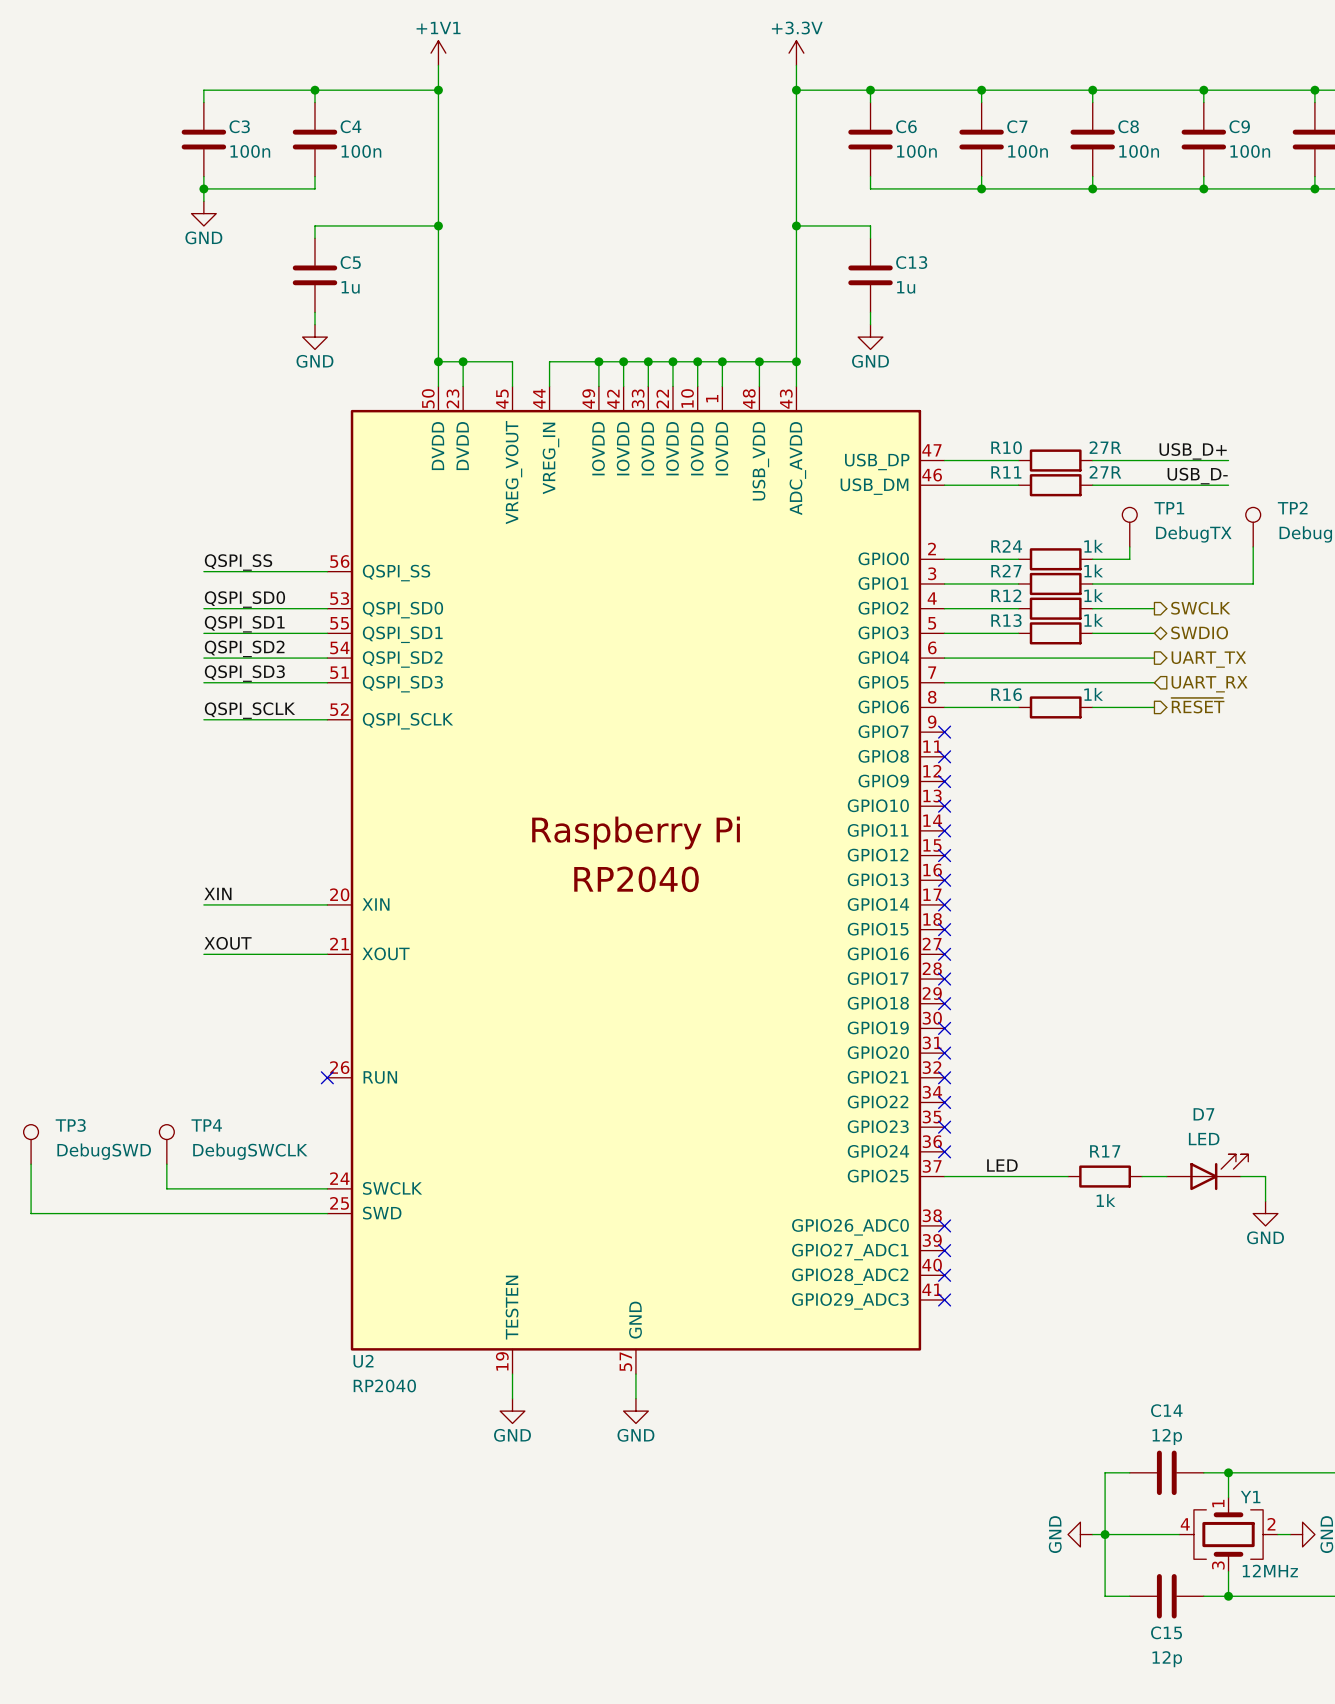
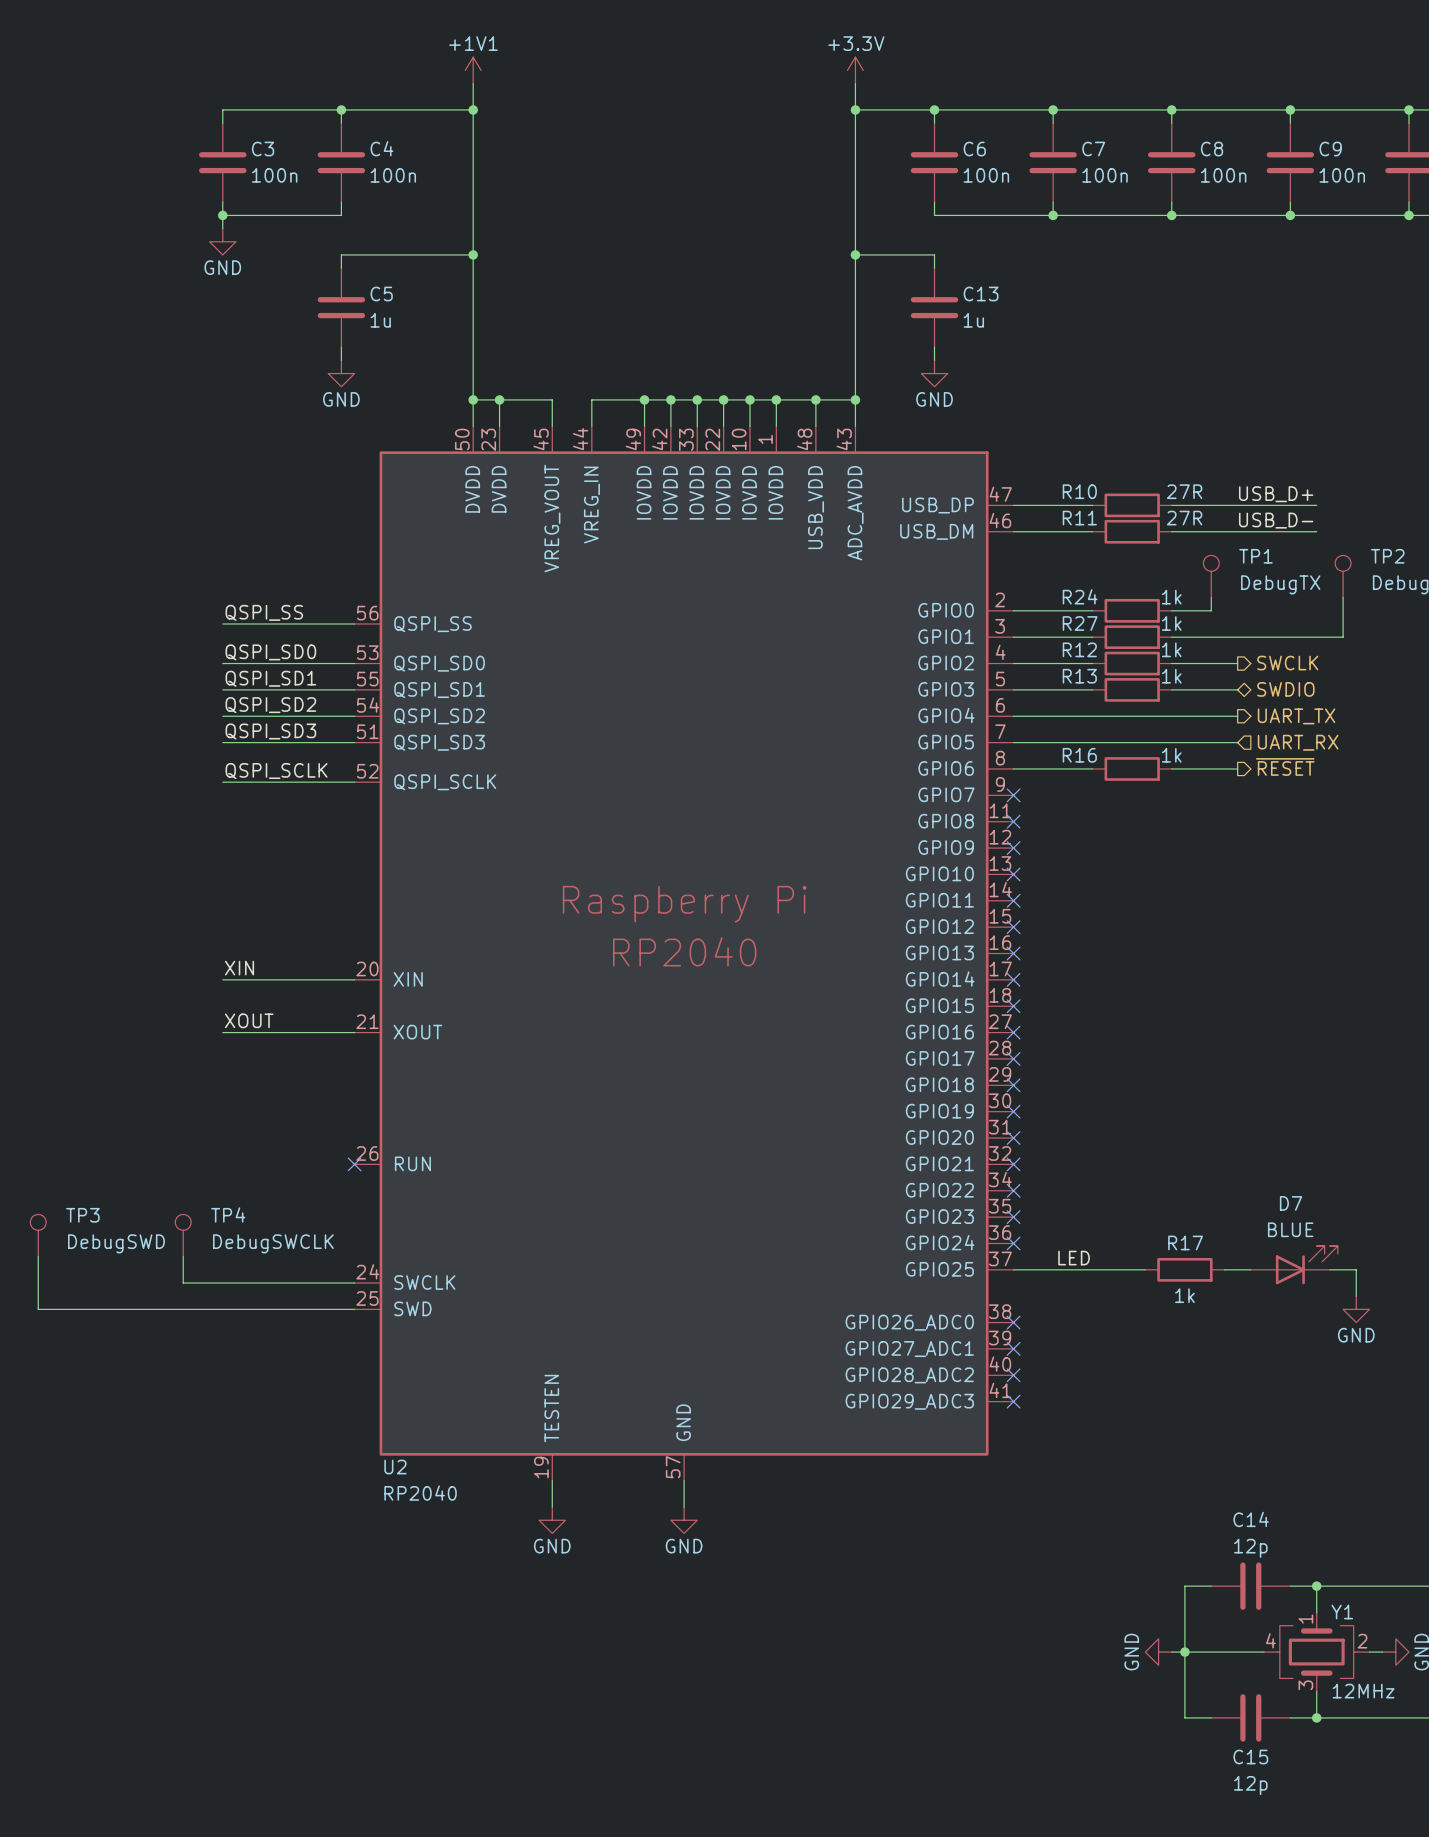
D7 value: LED (1204, 1139) -> BLUE (1290, 1229)

